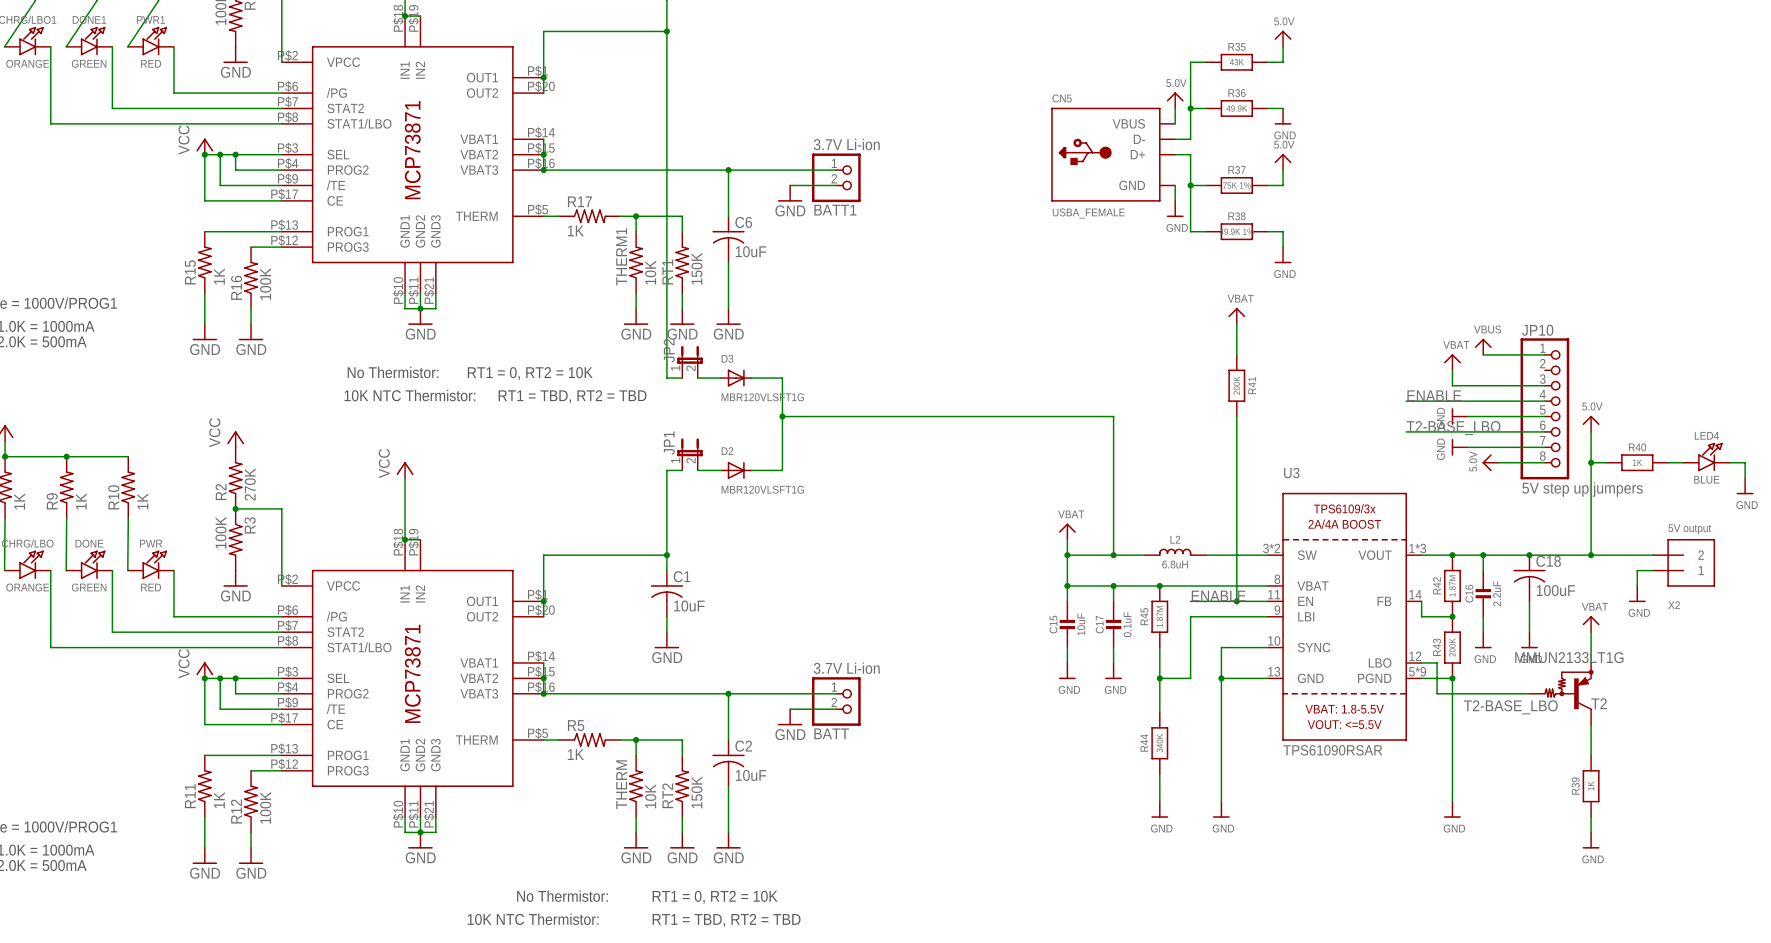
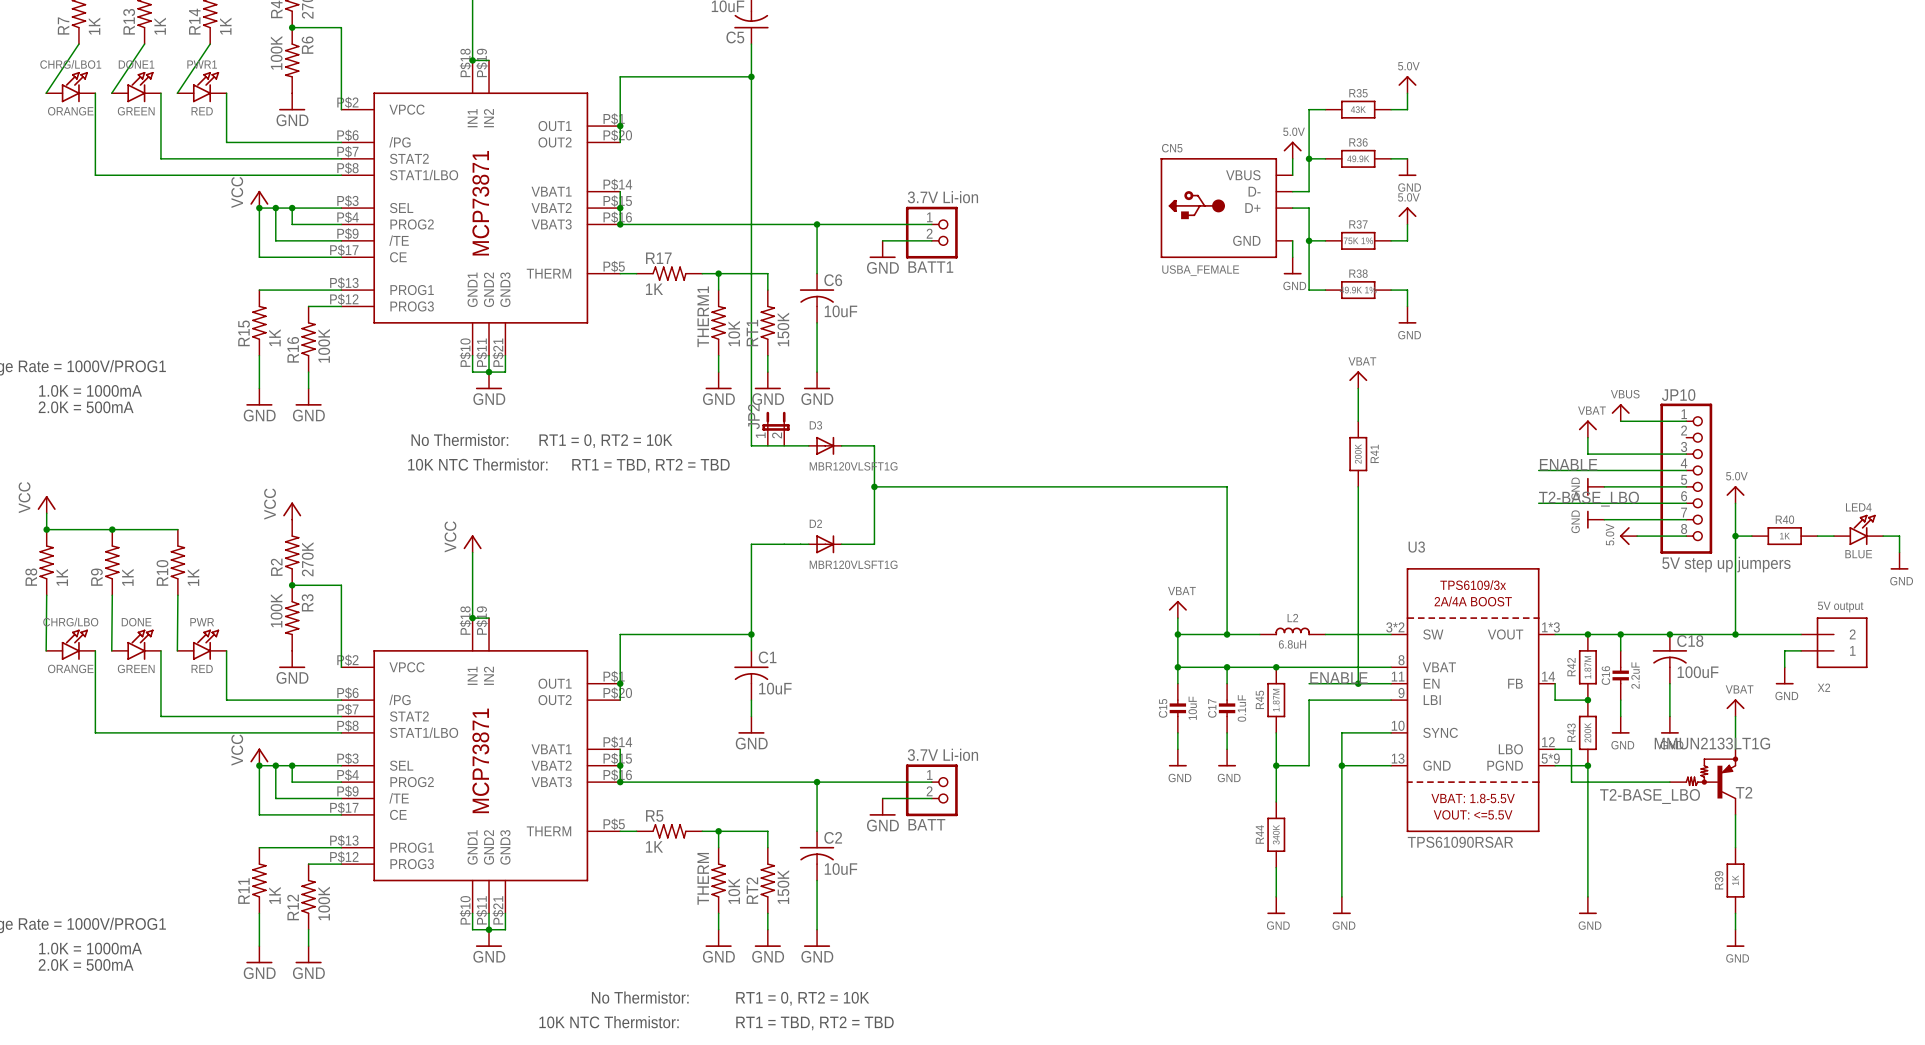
wire: none -> (767, 445) (784, 445)
JP1: (690, 454) -> none
wire: none -> (767, 544) (784, 544)

